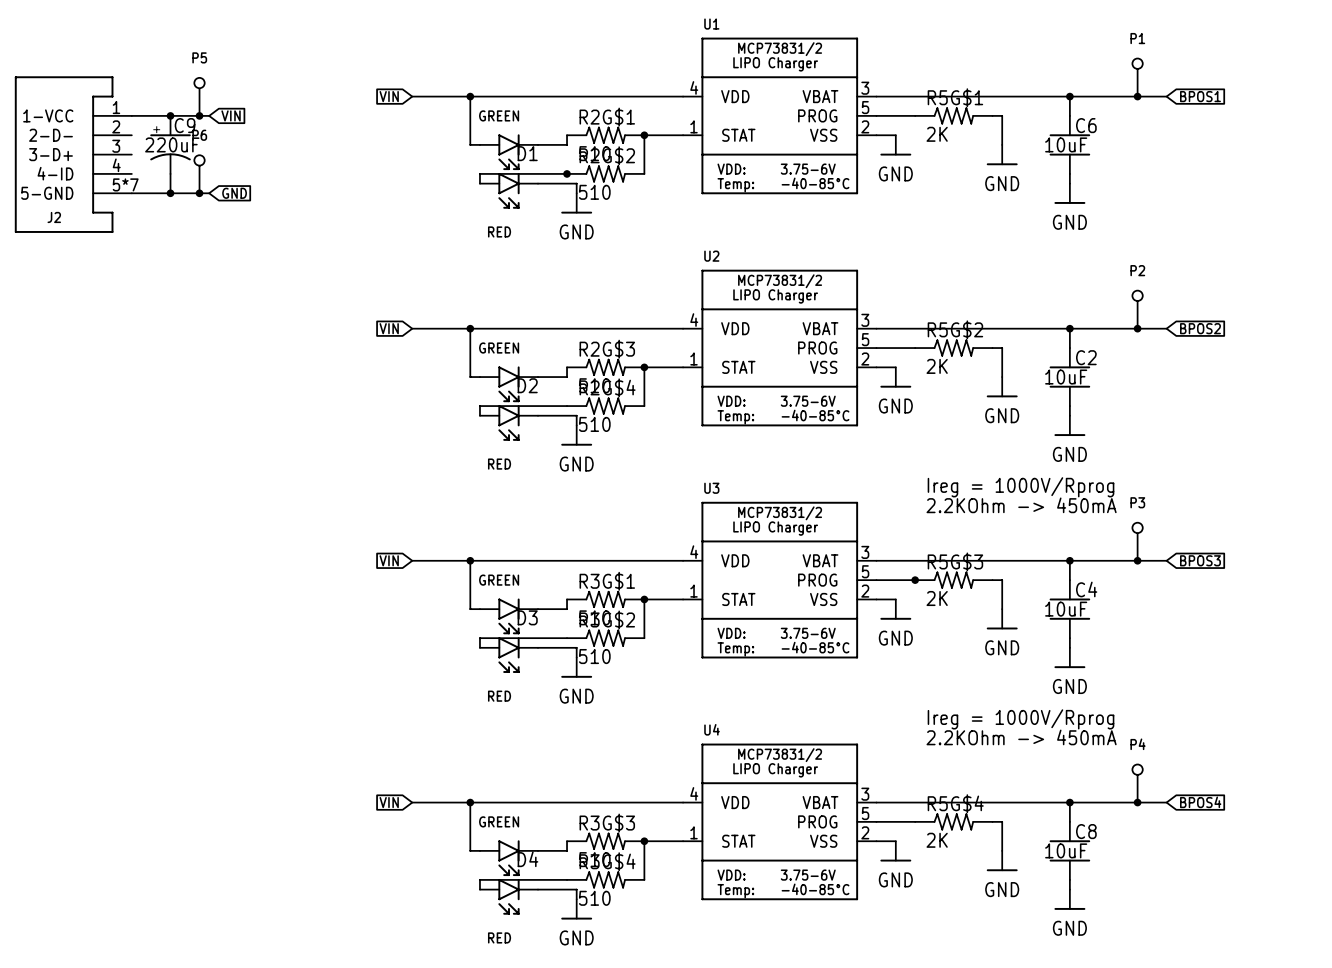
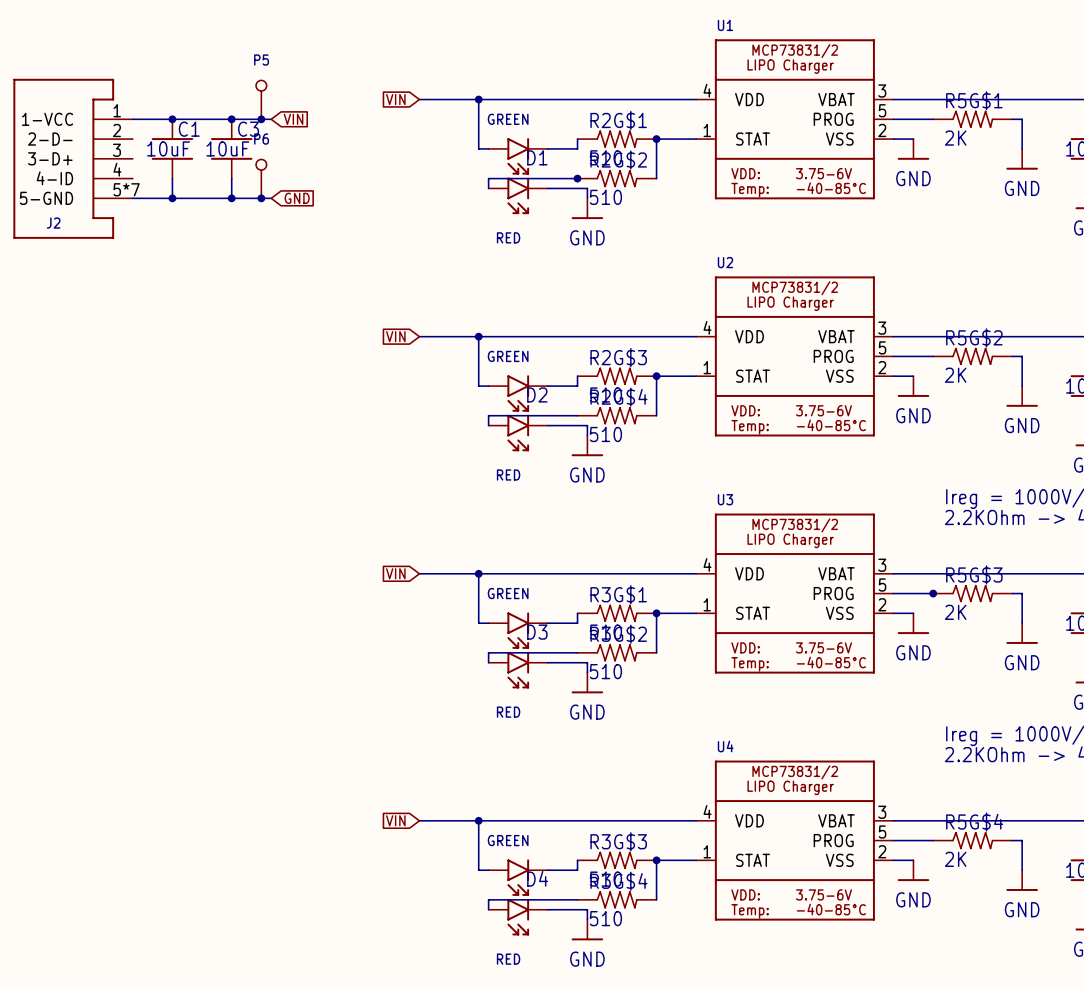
P5 position: (199, 96) -> (261, 99)
junction: (199, 115) -> none
wire: none -> (211, 119) (271, 119)
junction: none -> (231, 119)
global label position: VIN (231, 115) -> VIN (293, 119)
junction: none -> (261, 119)
C9: 220uF (170, 144) -> none
C1: none -> 10uF (172, 148)
C3: none -> 10uF (231, 148)
wire: none -> (231, 178) (231, 198)
P6 position: (199, 174) -> (261, 178)
junction: (199, 193) -> none
wire: none -> (211, 198) (271, 198)
junction: none -> (231, 198)
global label position: GND (234, 193) -> GND (297, 198)
junction: none -> (261, 198)

